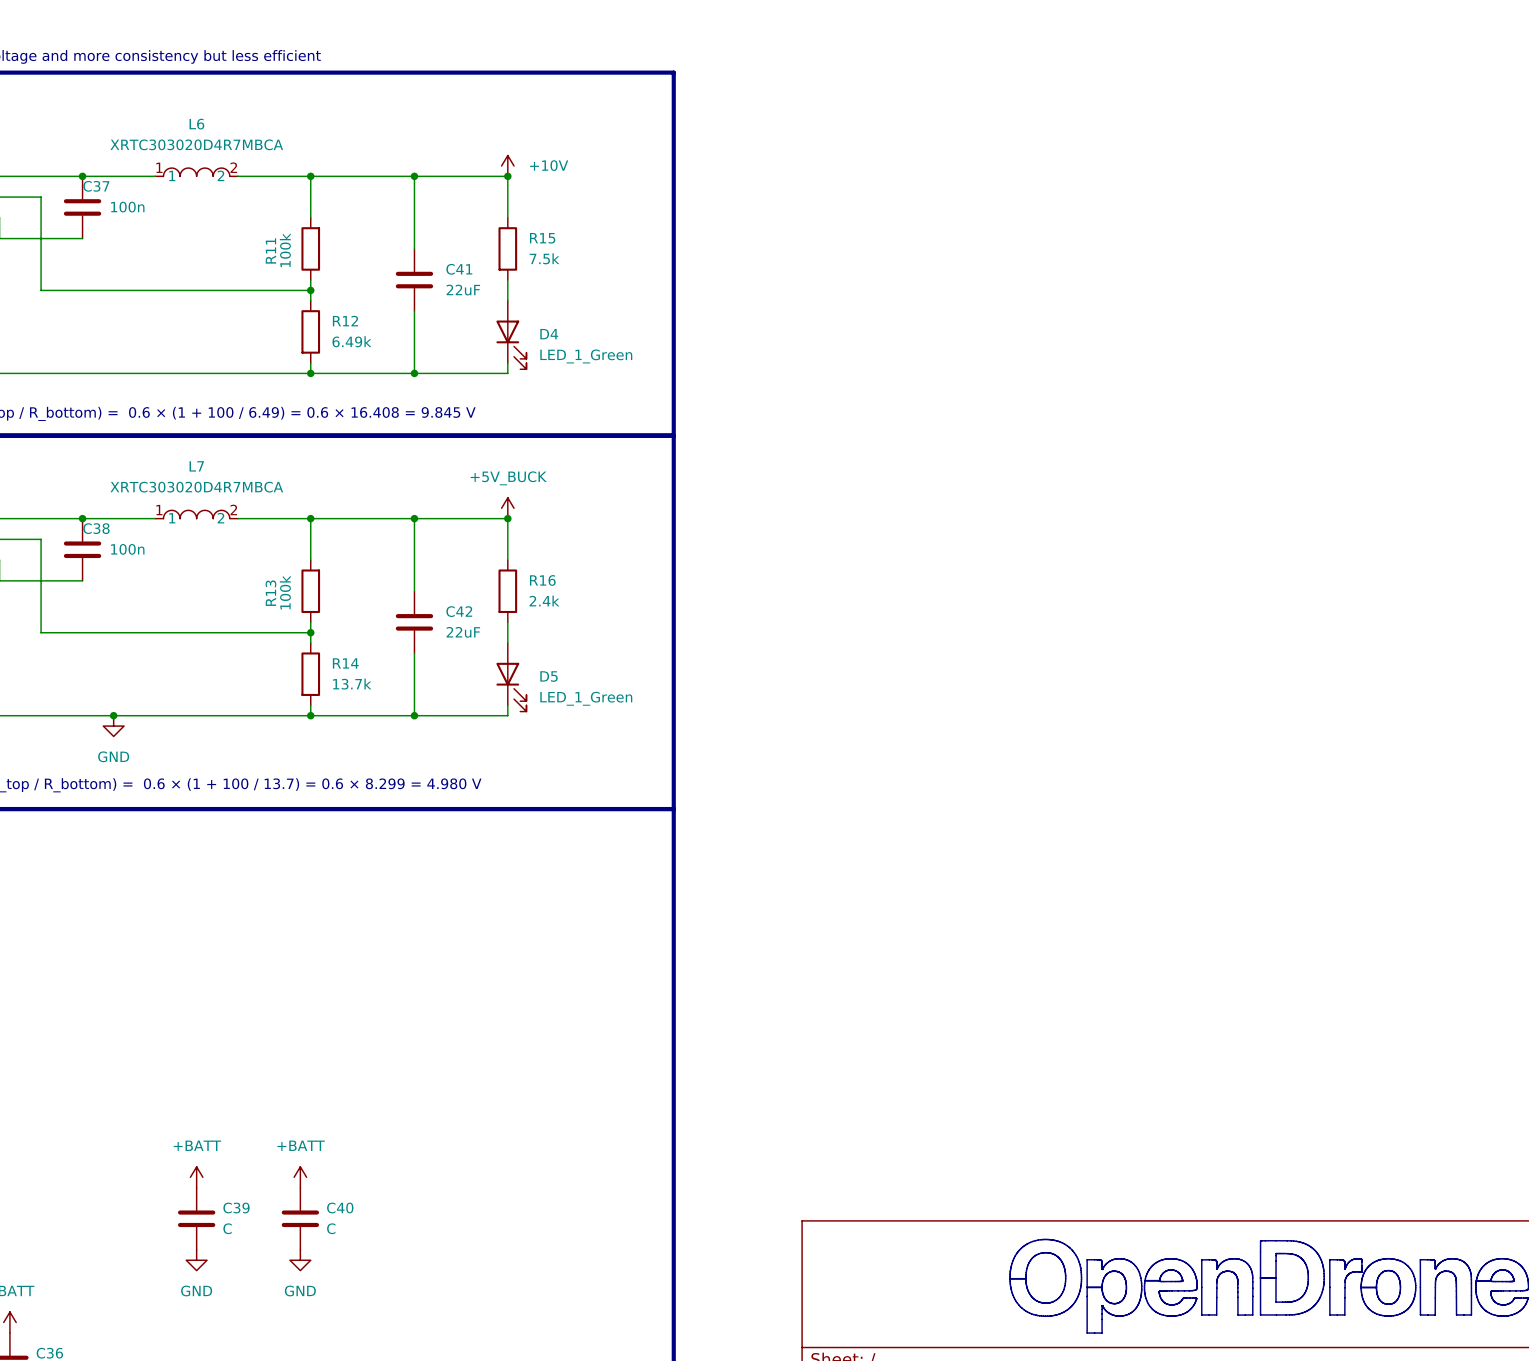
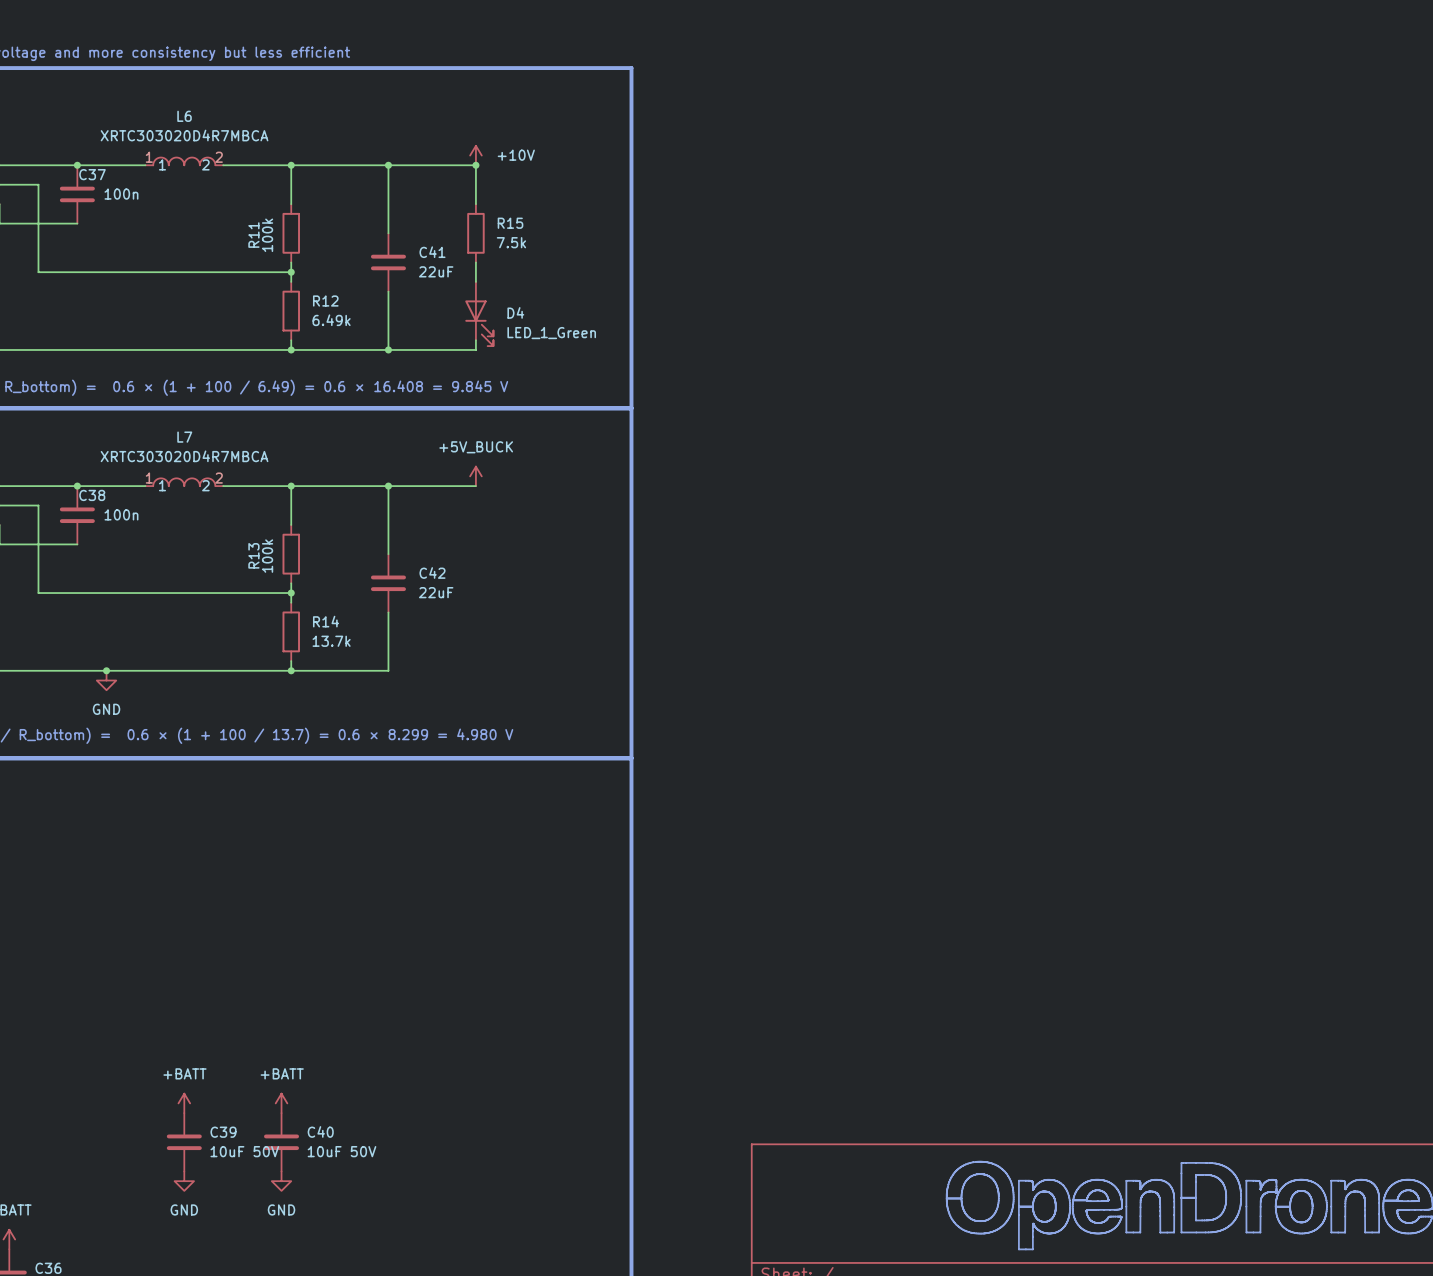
wire: (507, 518) (507, 560) -> none
junction: (507, 518) -> none
R16: 2.4k (507, 591) -> none
wire: (507, 622) (507, 643) -> none
D5: LED_1_Green (511, 677) -> none
wire: (507, 705) (507, 715) (414, 715) -> none
junction: (414, 715) -> none
C39 value: C (227, 1228) -> 10uF 50V (244, 1151)
C40 value: C (331, 1228) -> 10uF 50V (342, 1151)

